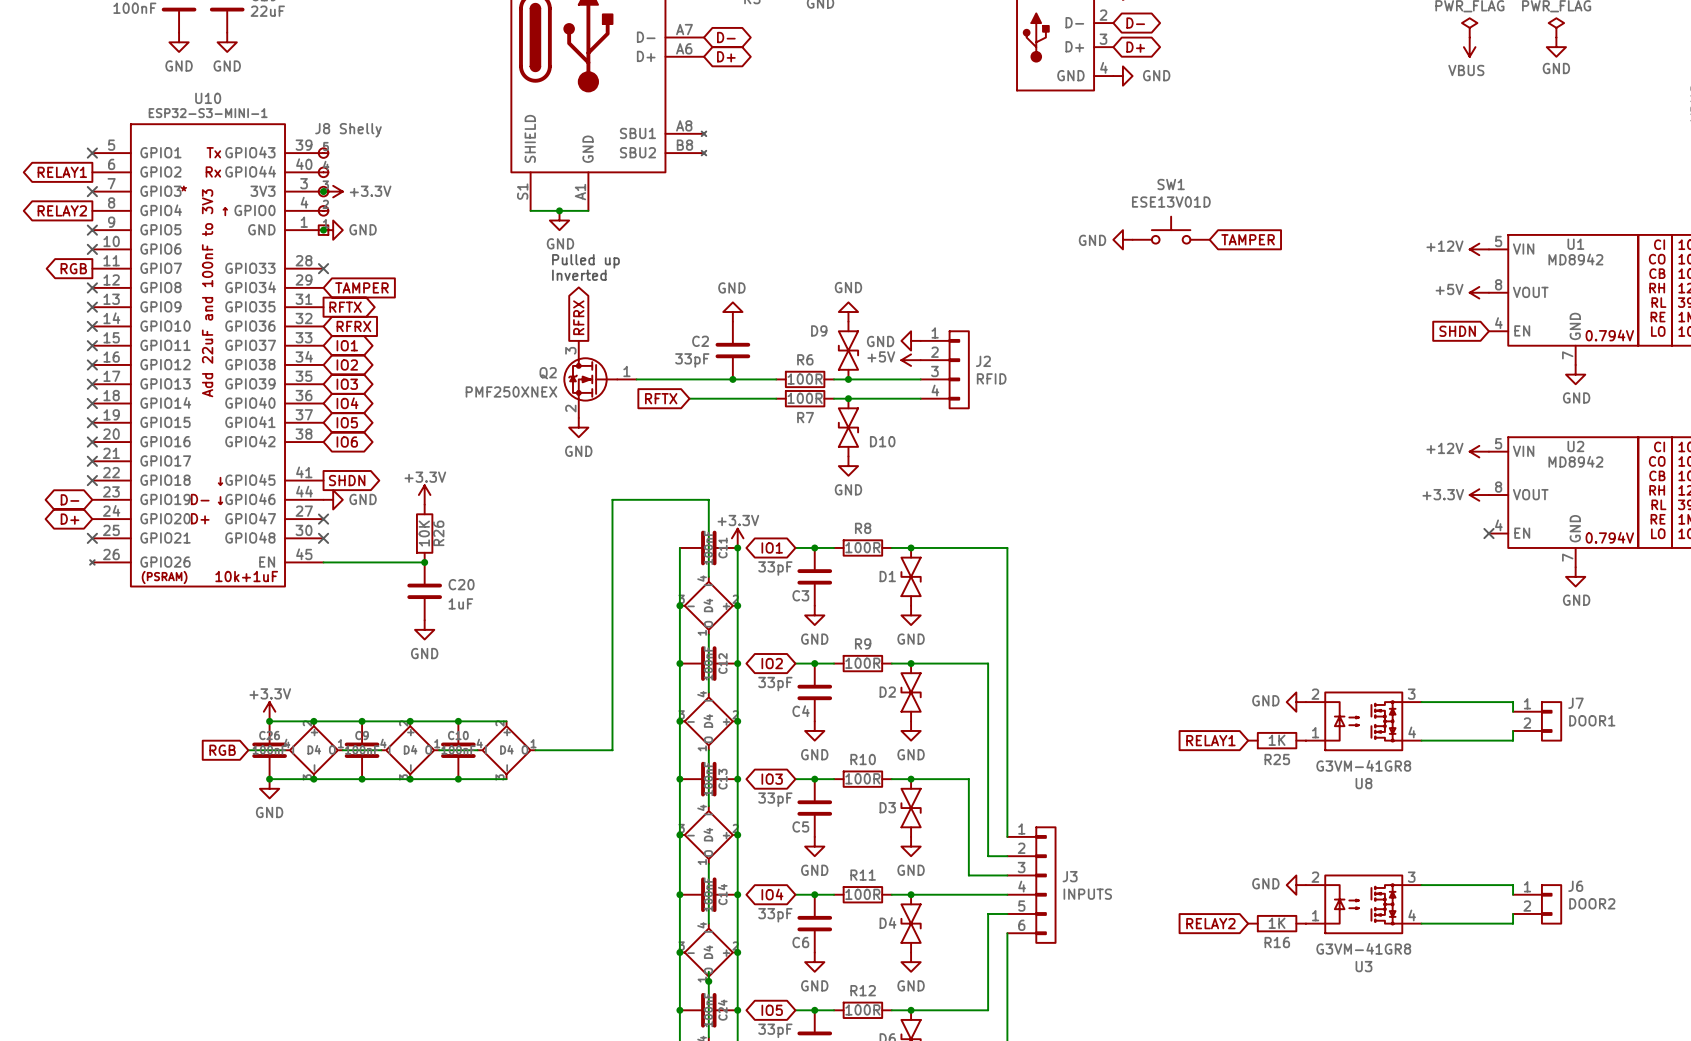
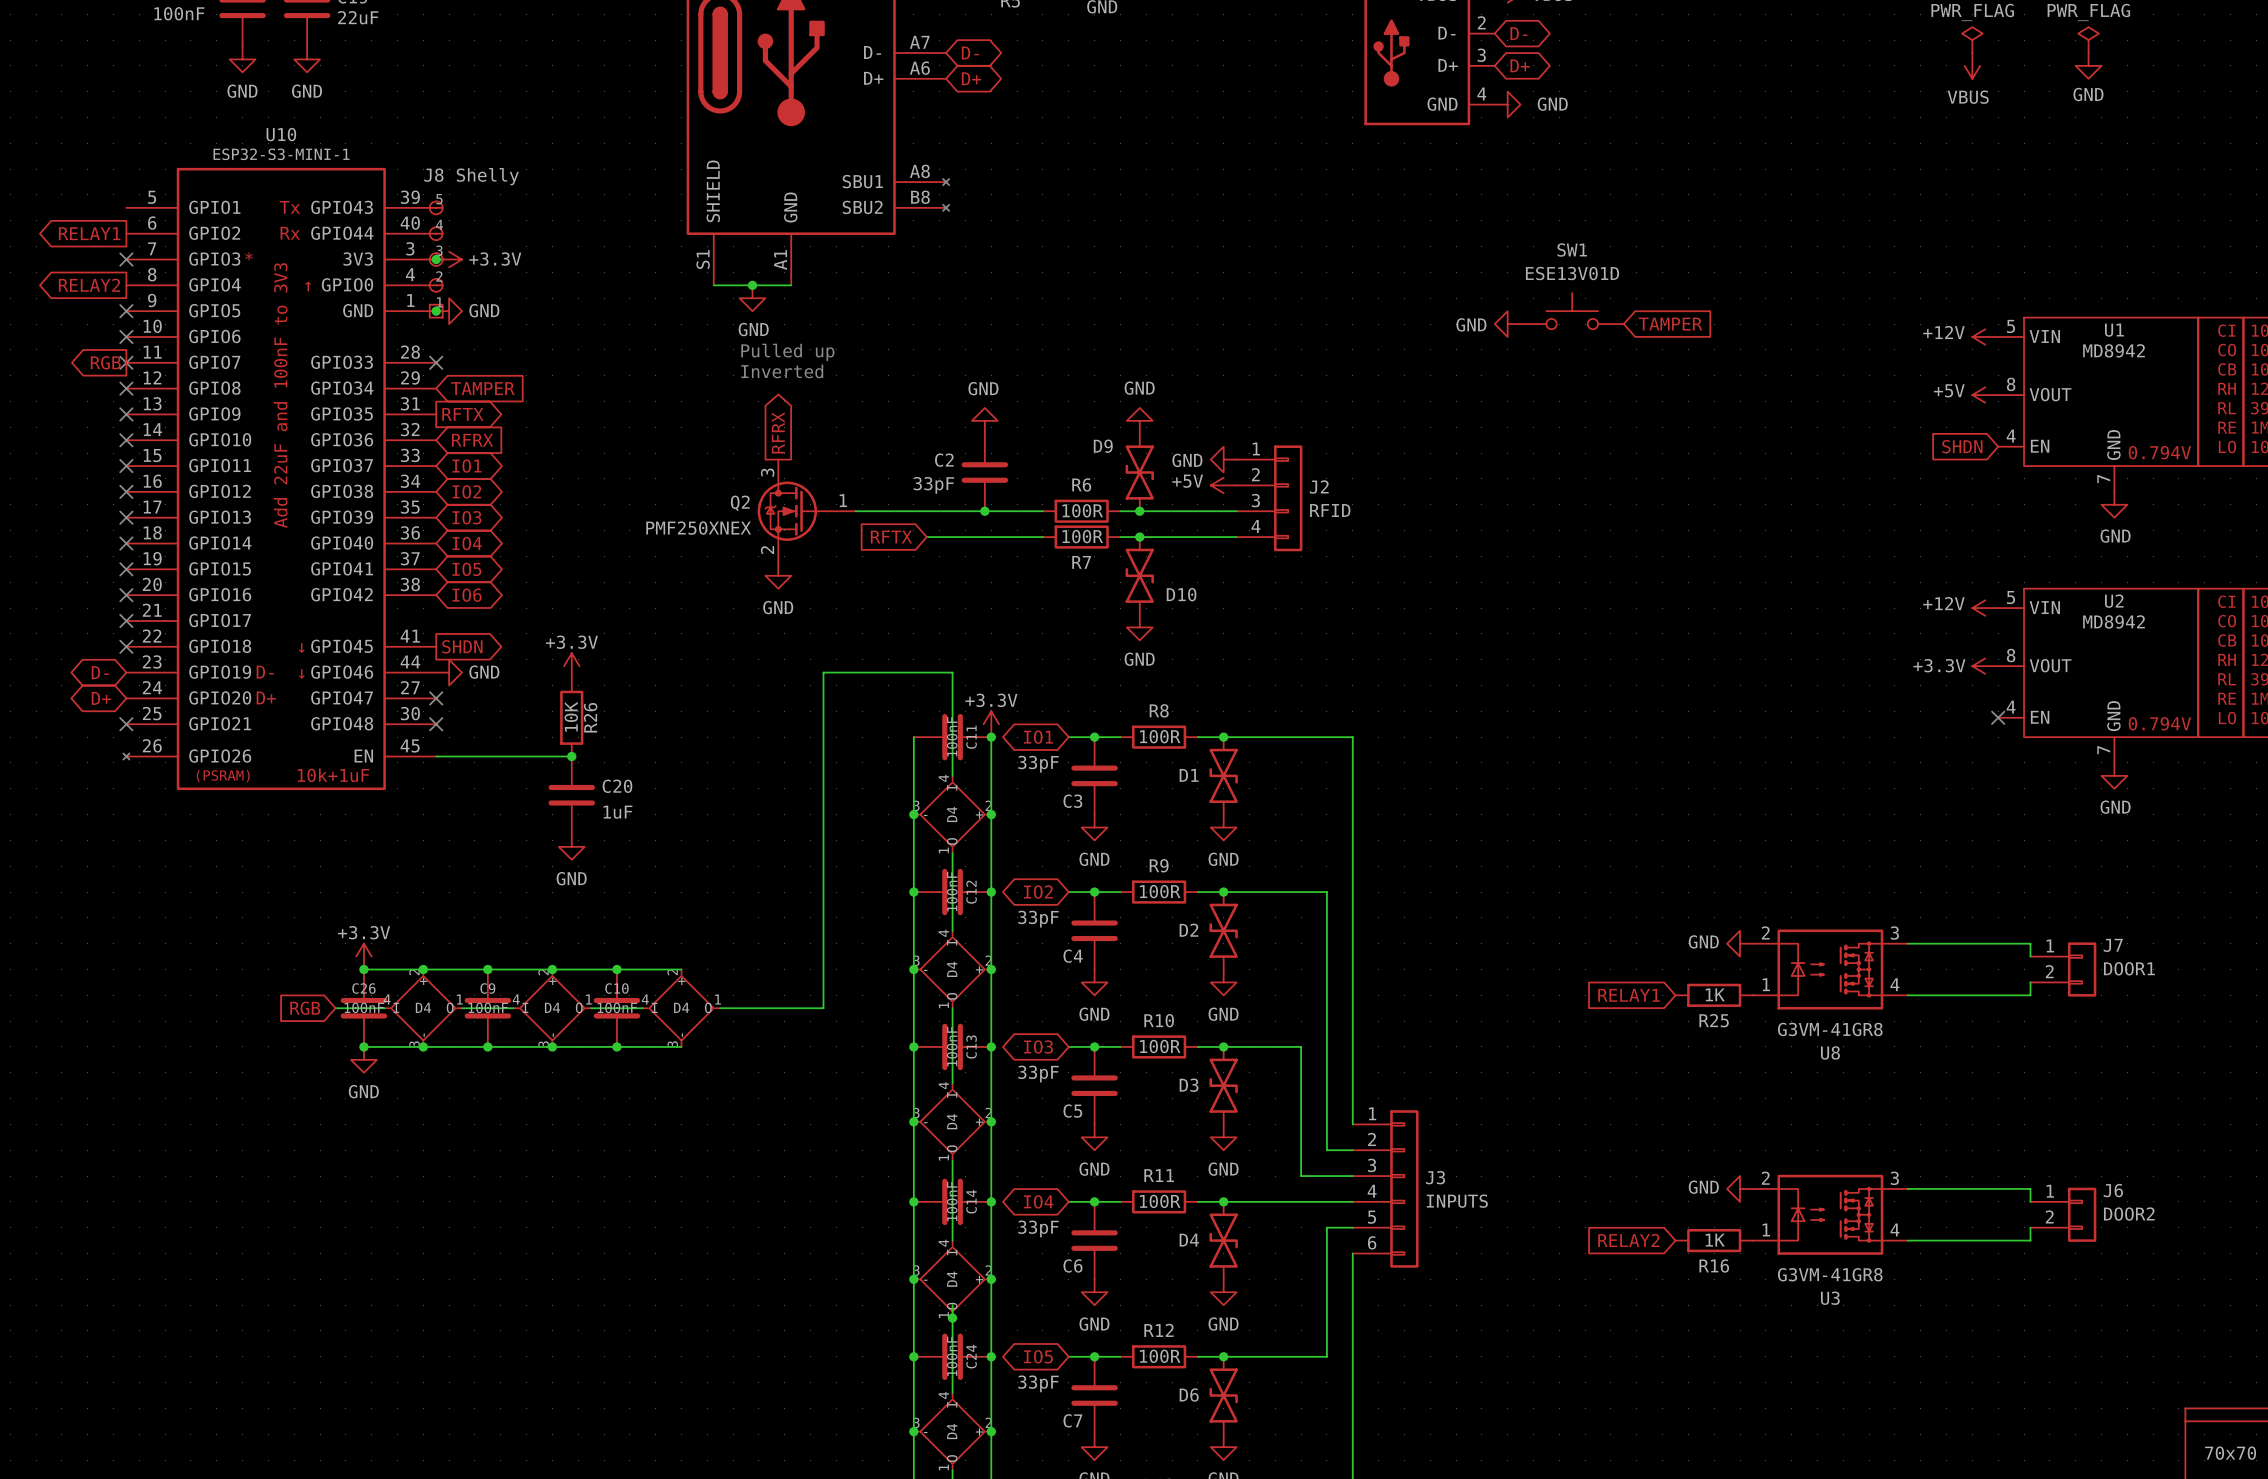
no-connect mark: (92, 153) -> none
no-connect mark: none -> (126, 362)

